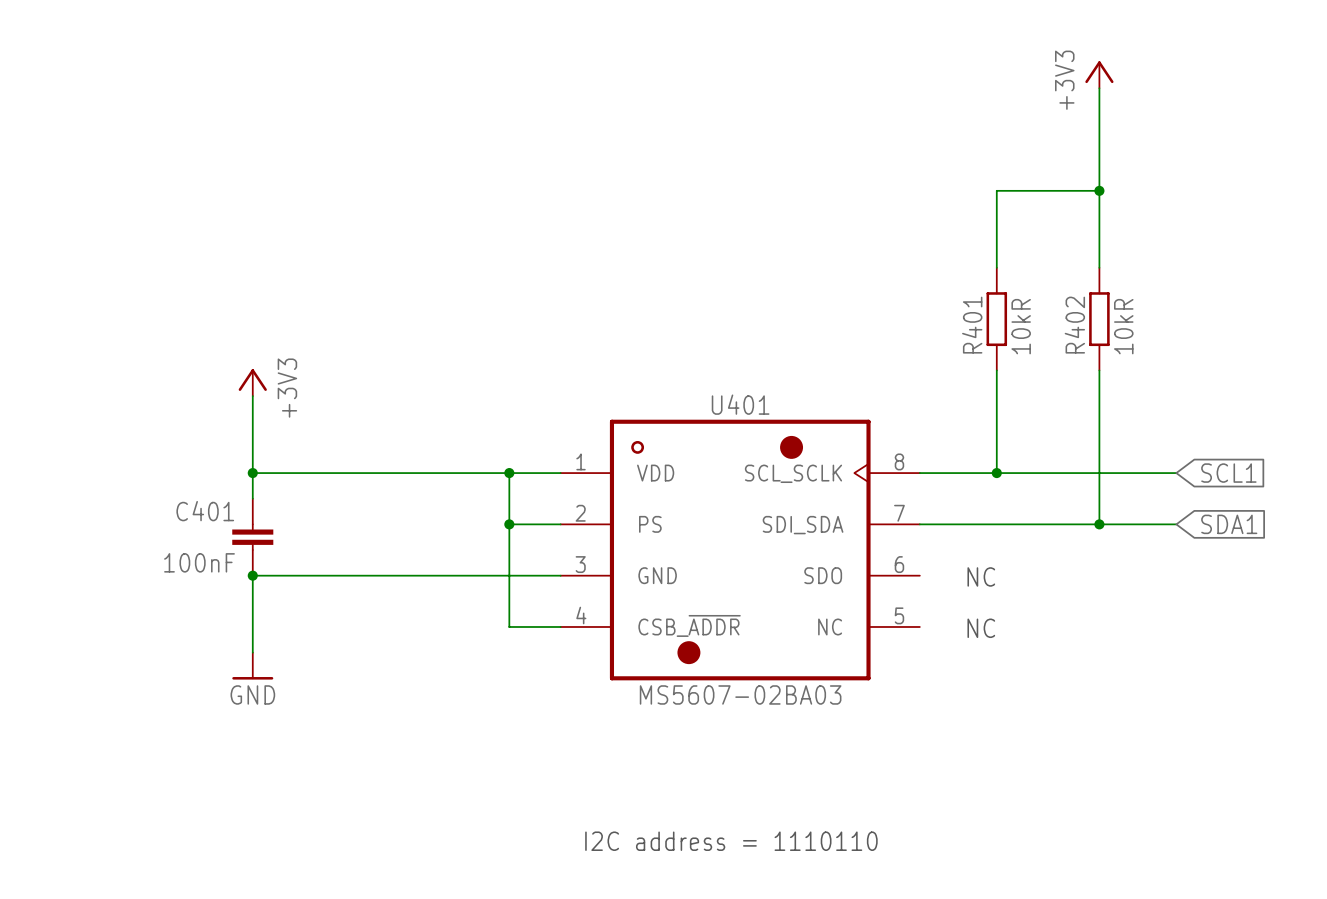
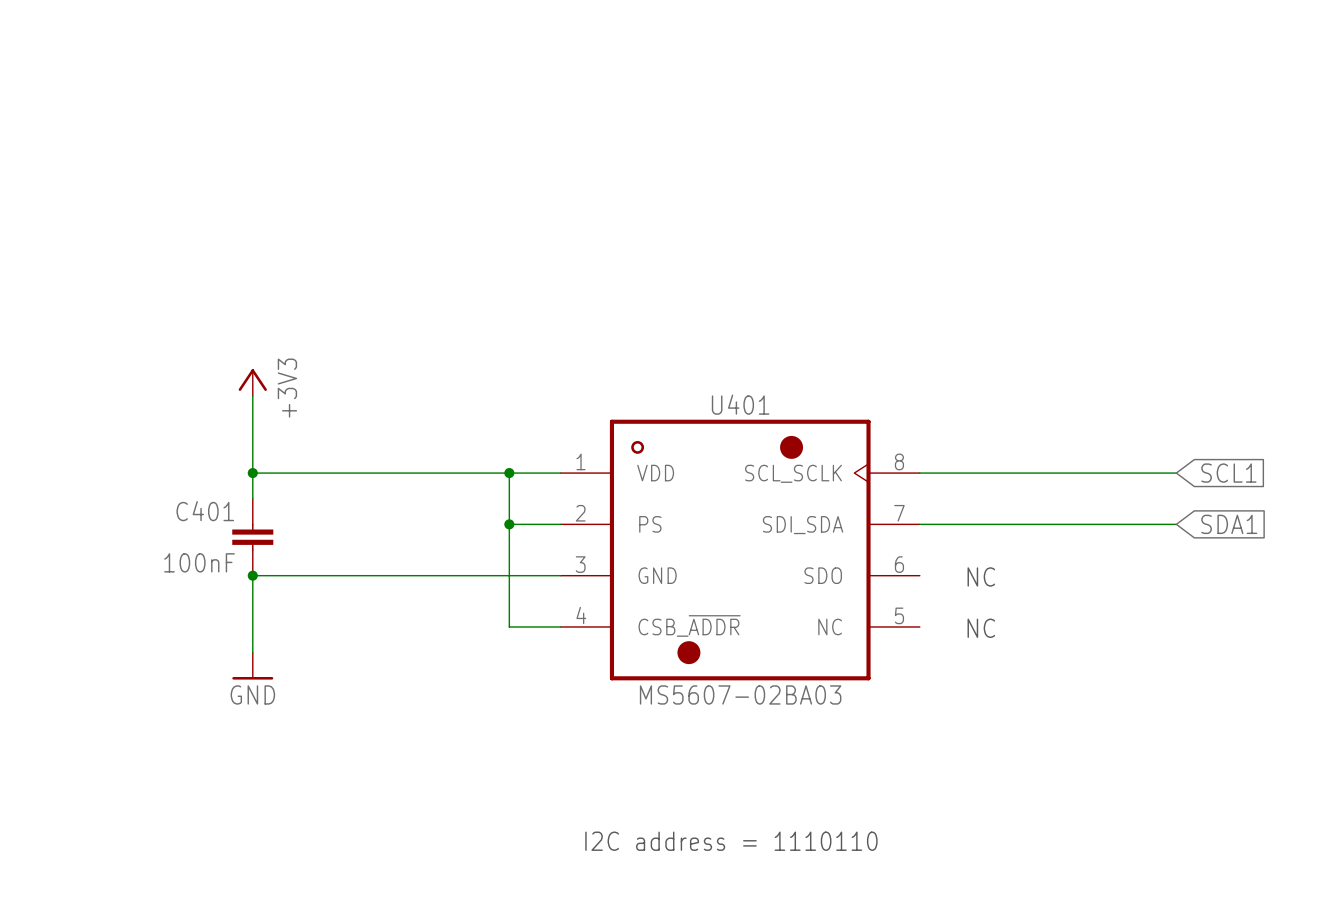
power symbol: +3V3 (1099, 74) -> none
wire: (1099, 88) (1099, 267) -> none
wire: (1099, 190) (996, 190) (996, 267) -> none
junction: (1099, 190) -> none
R401: 10kR (996, 319) -> none
R402: 10kR (1099, 319) -> none
wire: (996, 370) (996, 473) -> none
wire: (1099, 370) (1099, 524) -> none
junction: (996, 473) -> none
junction: (1099, 524) -> none

